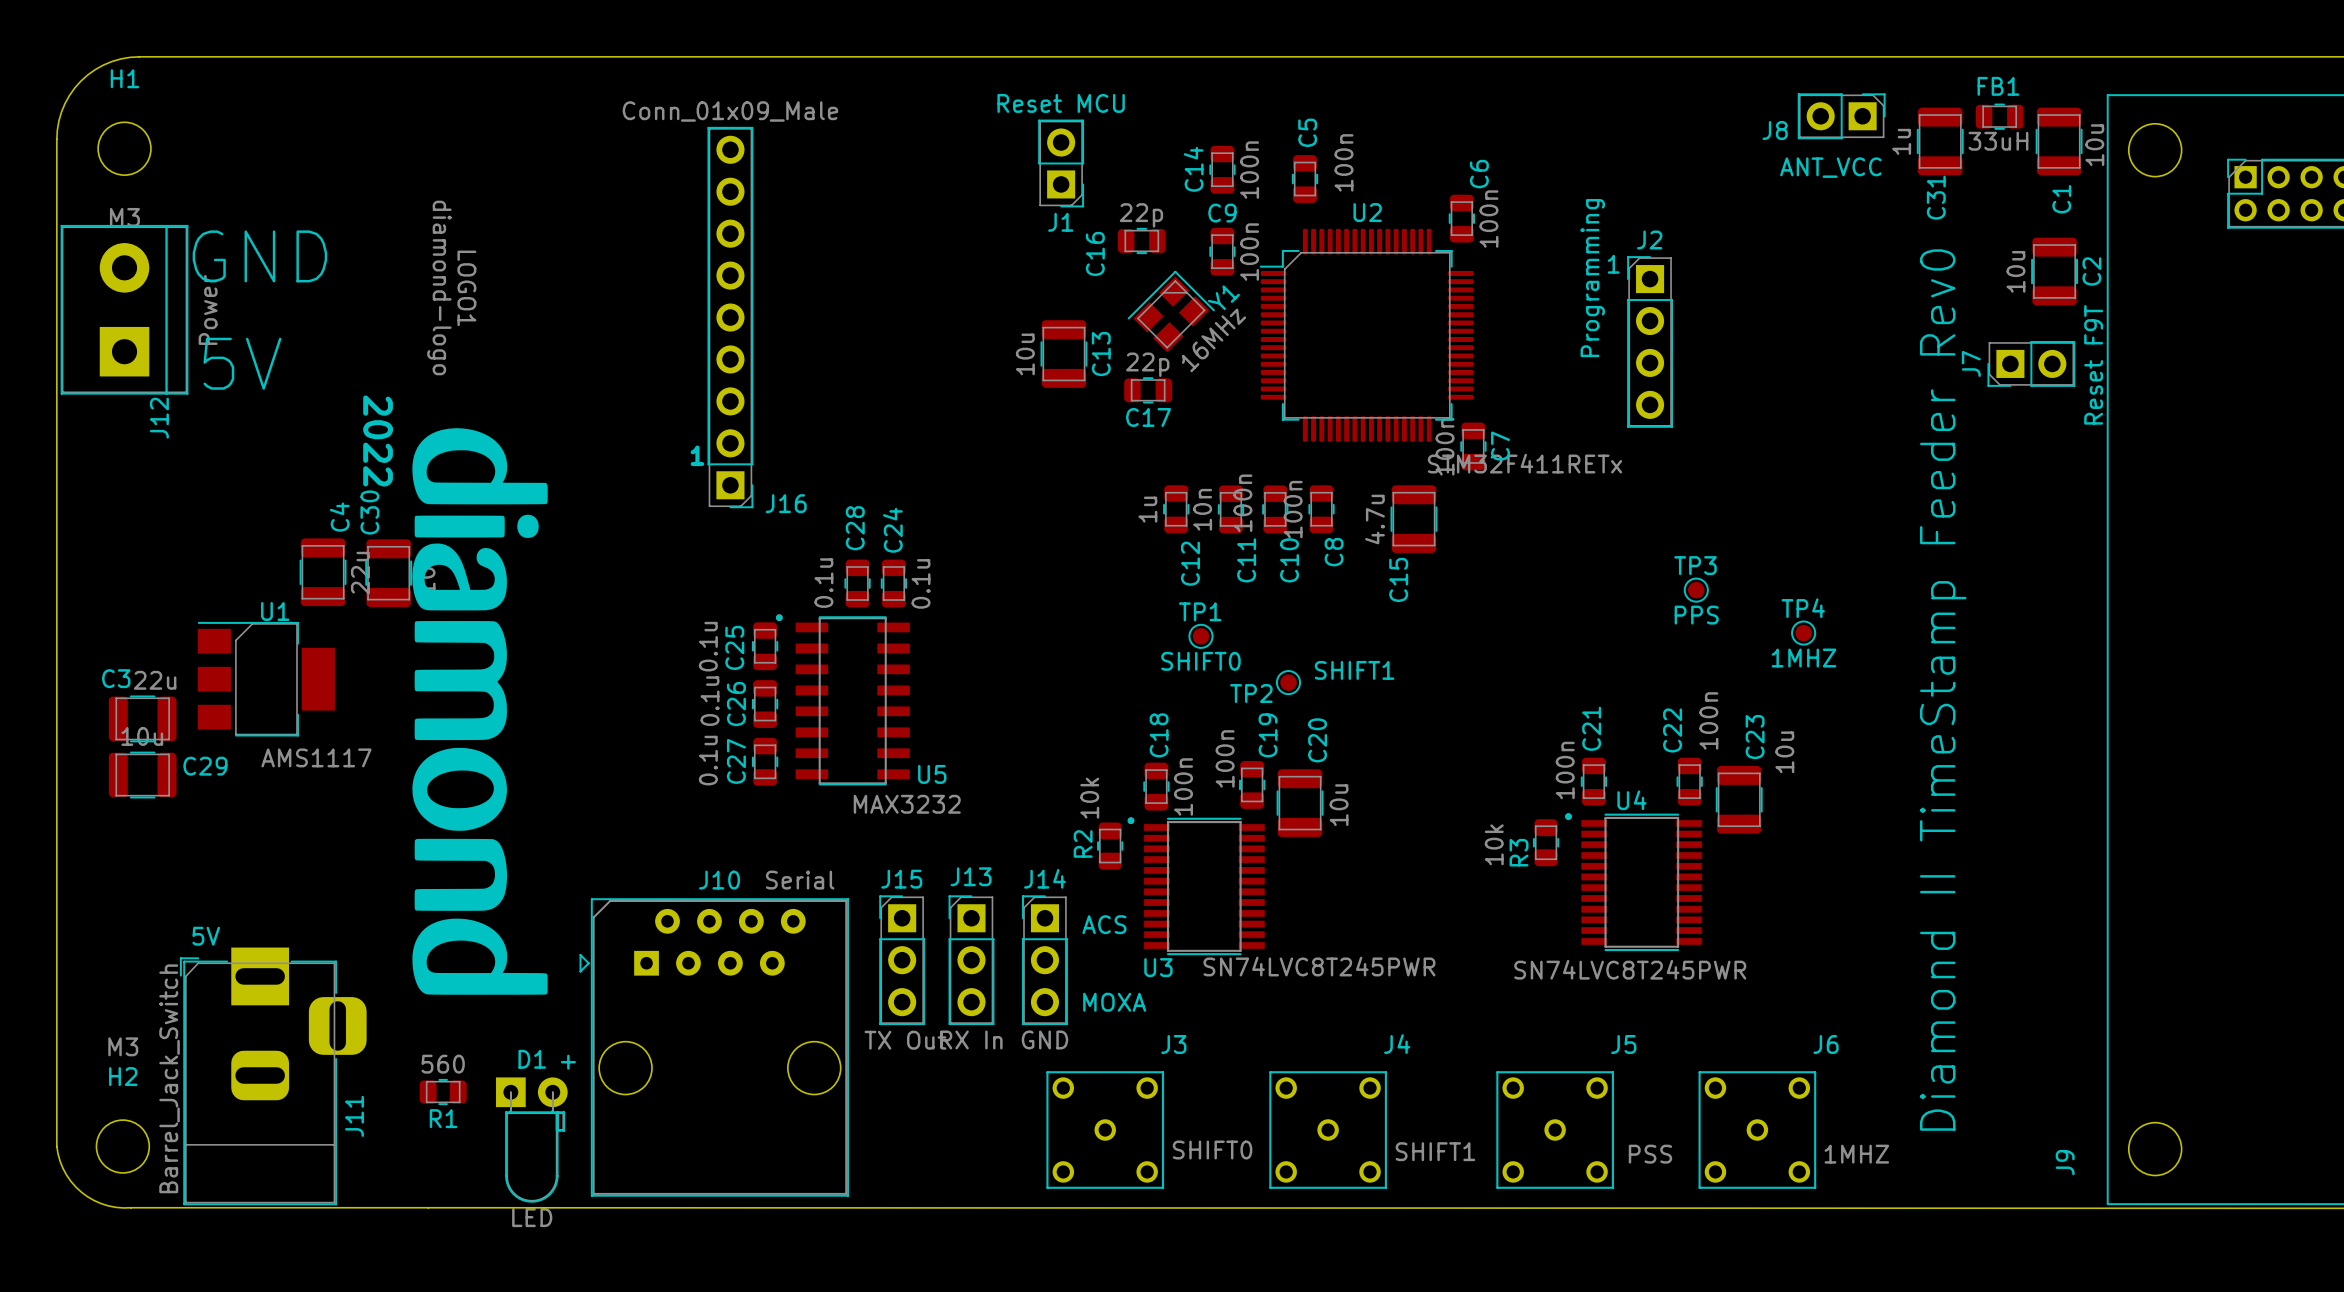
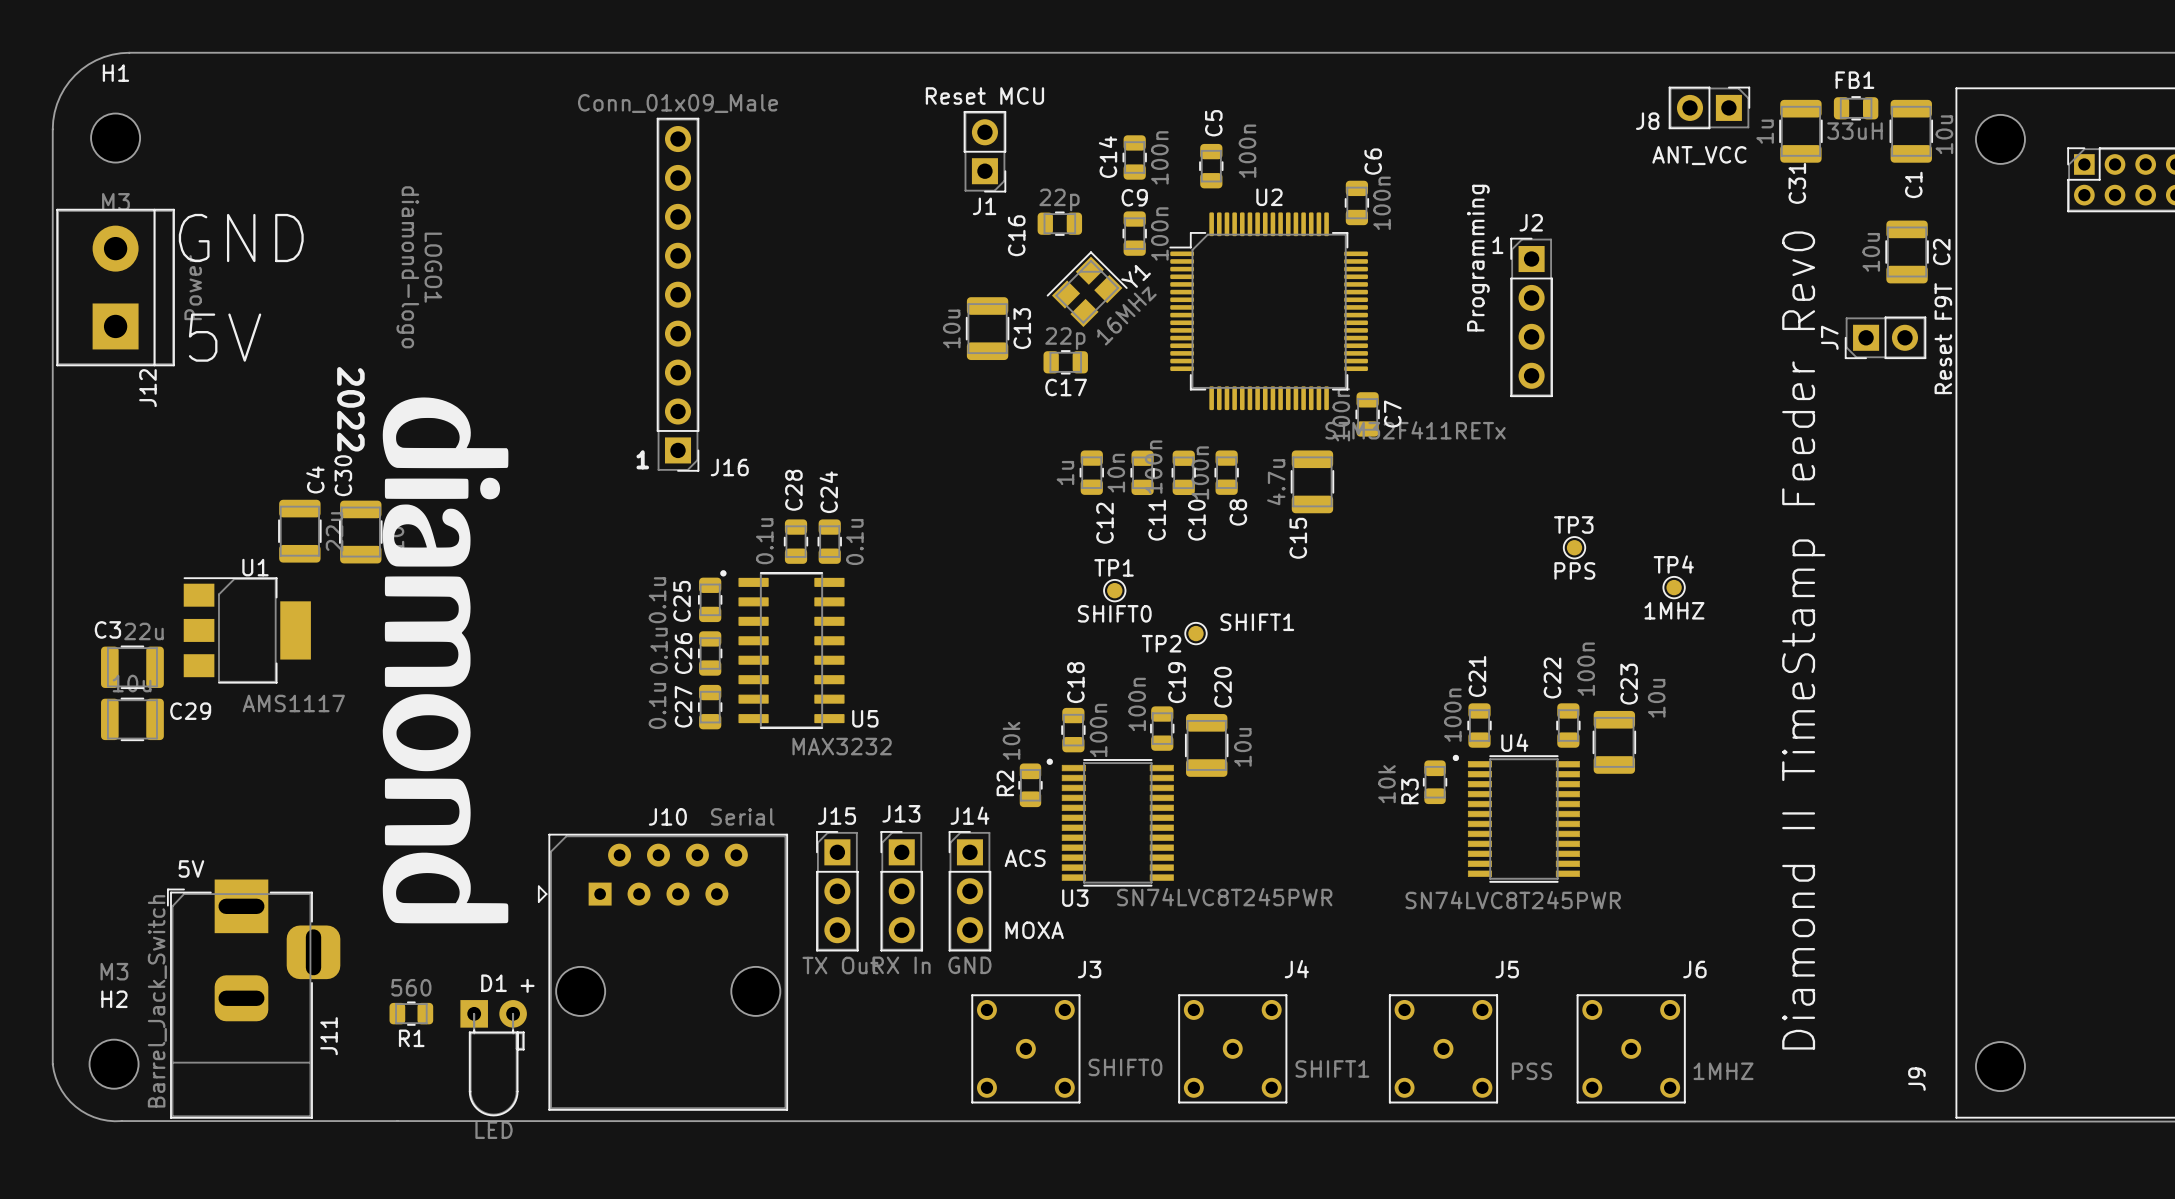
text position: 1 (697, 455) -> 1 (642, 459)

